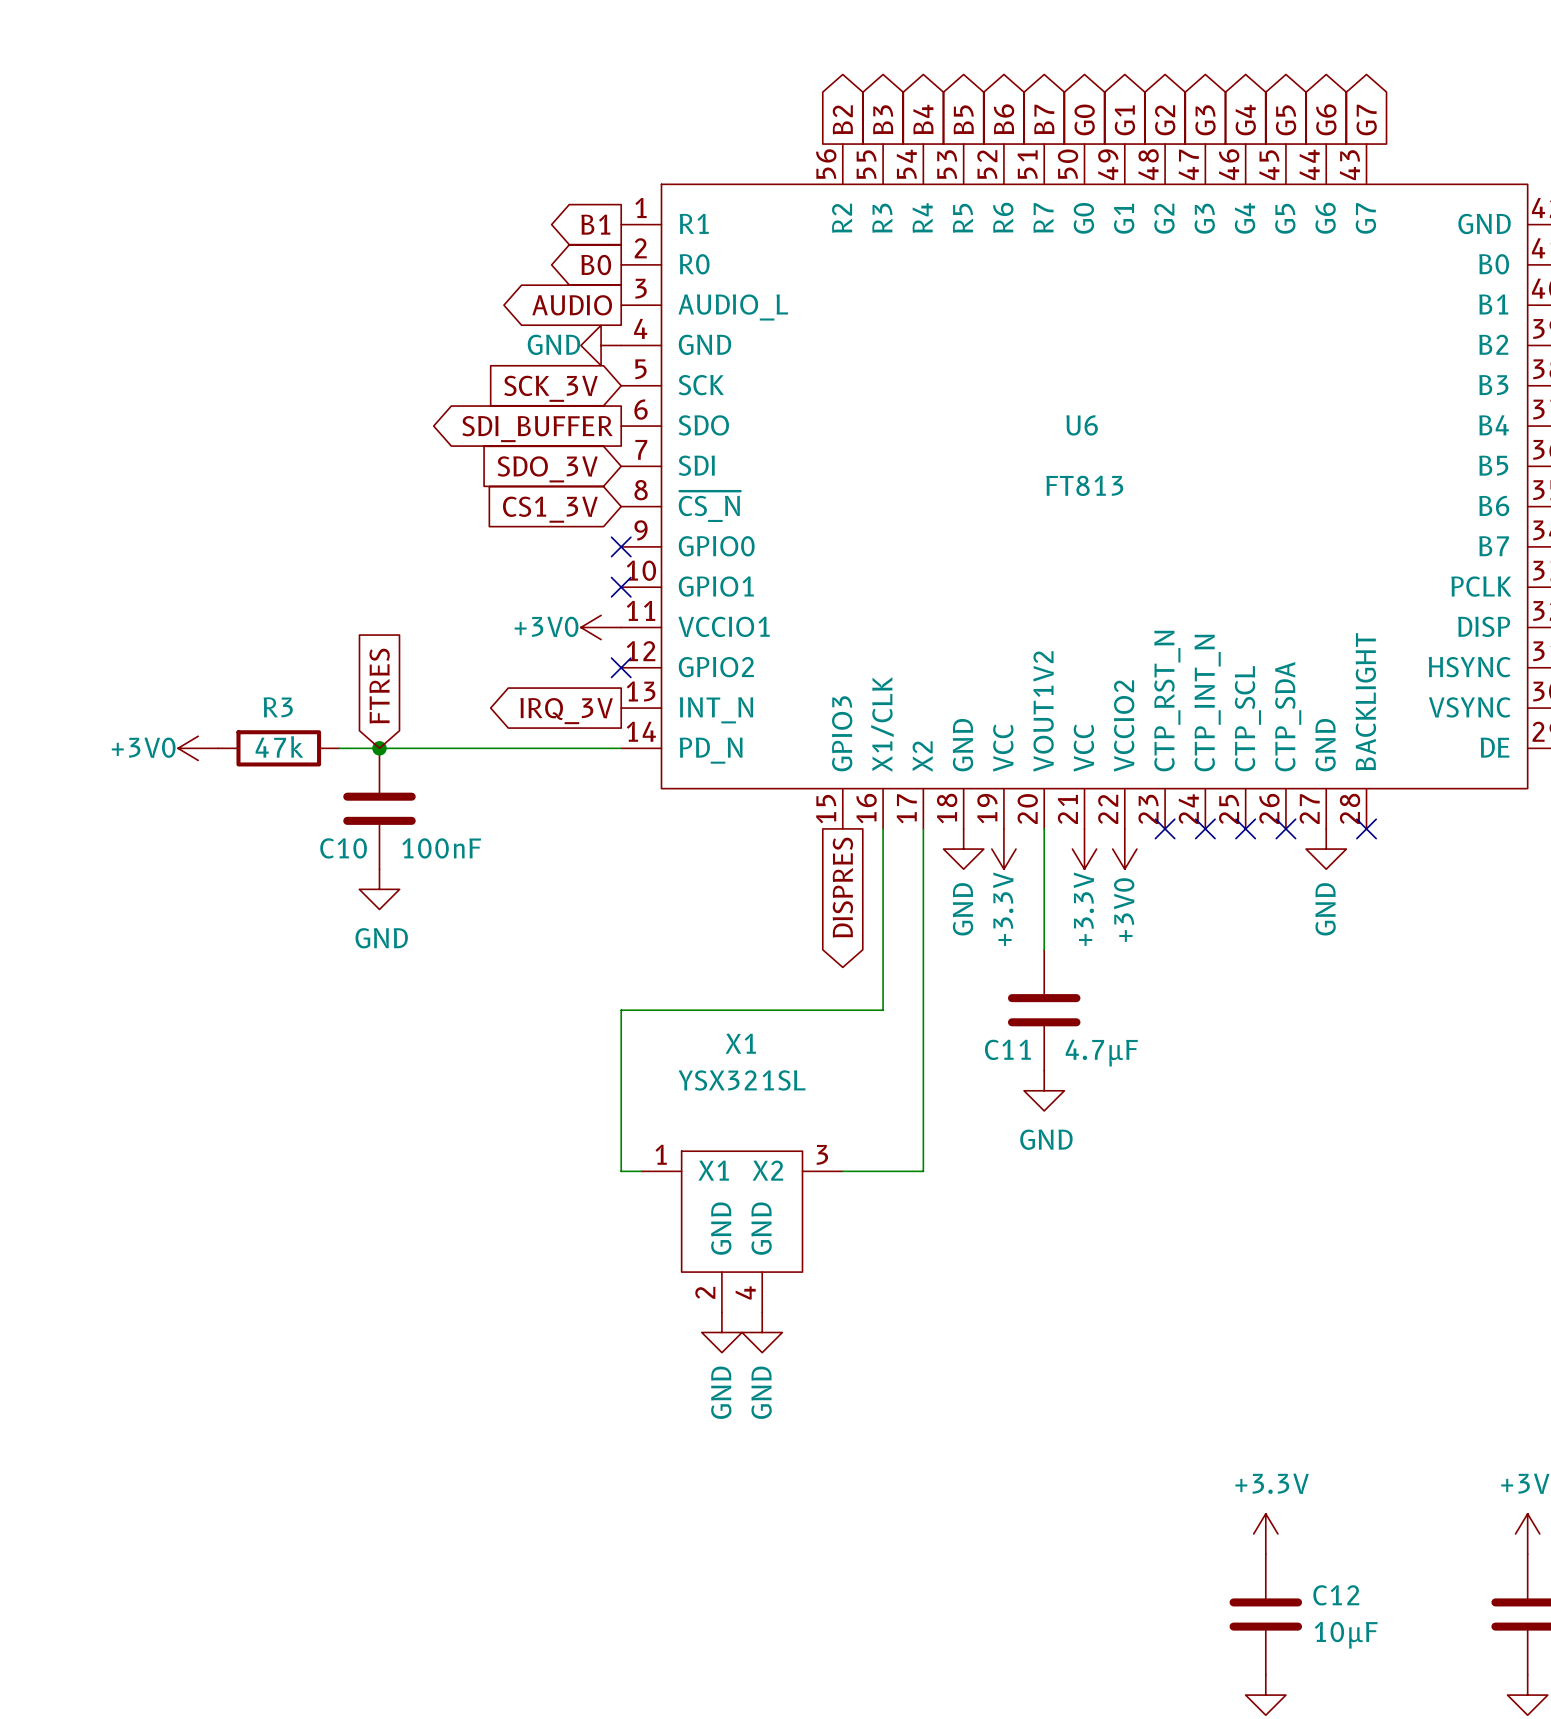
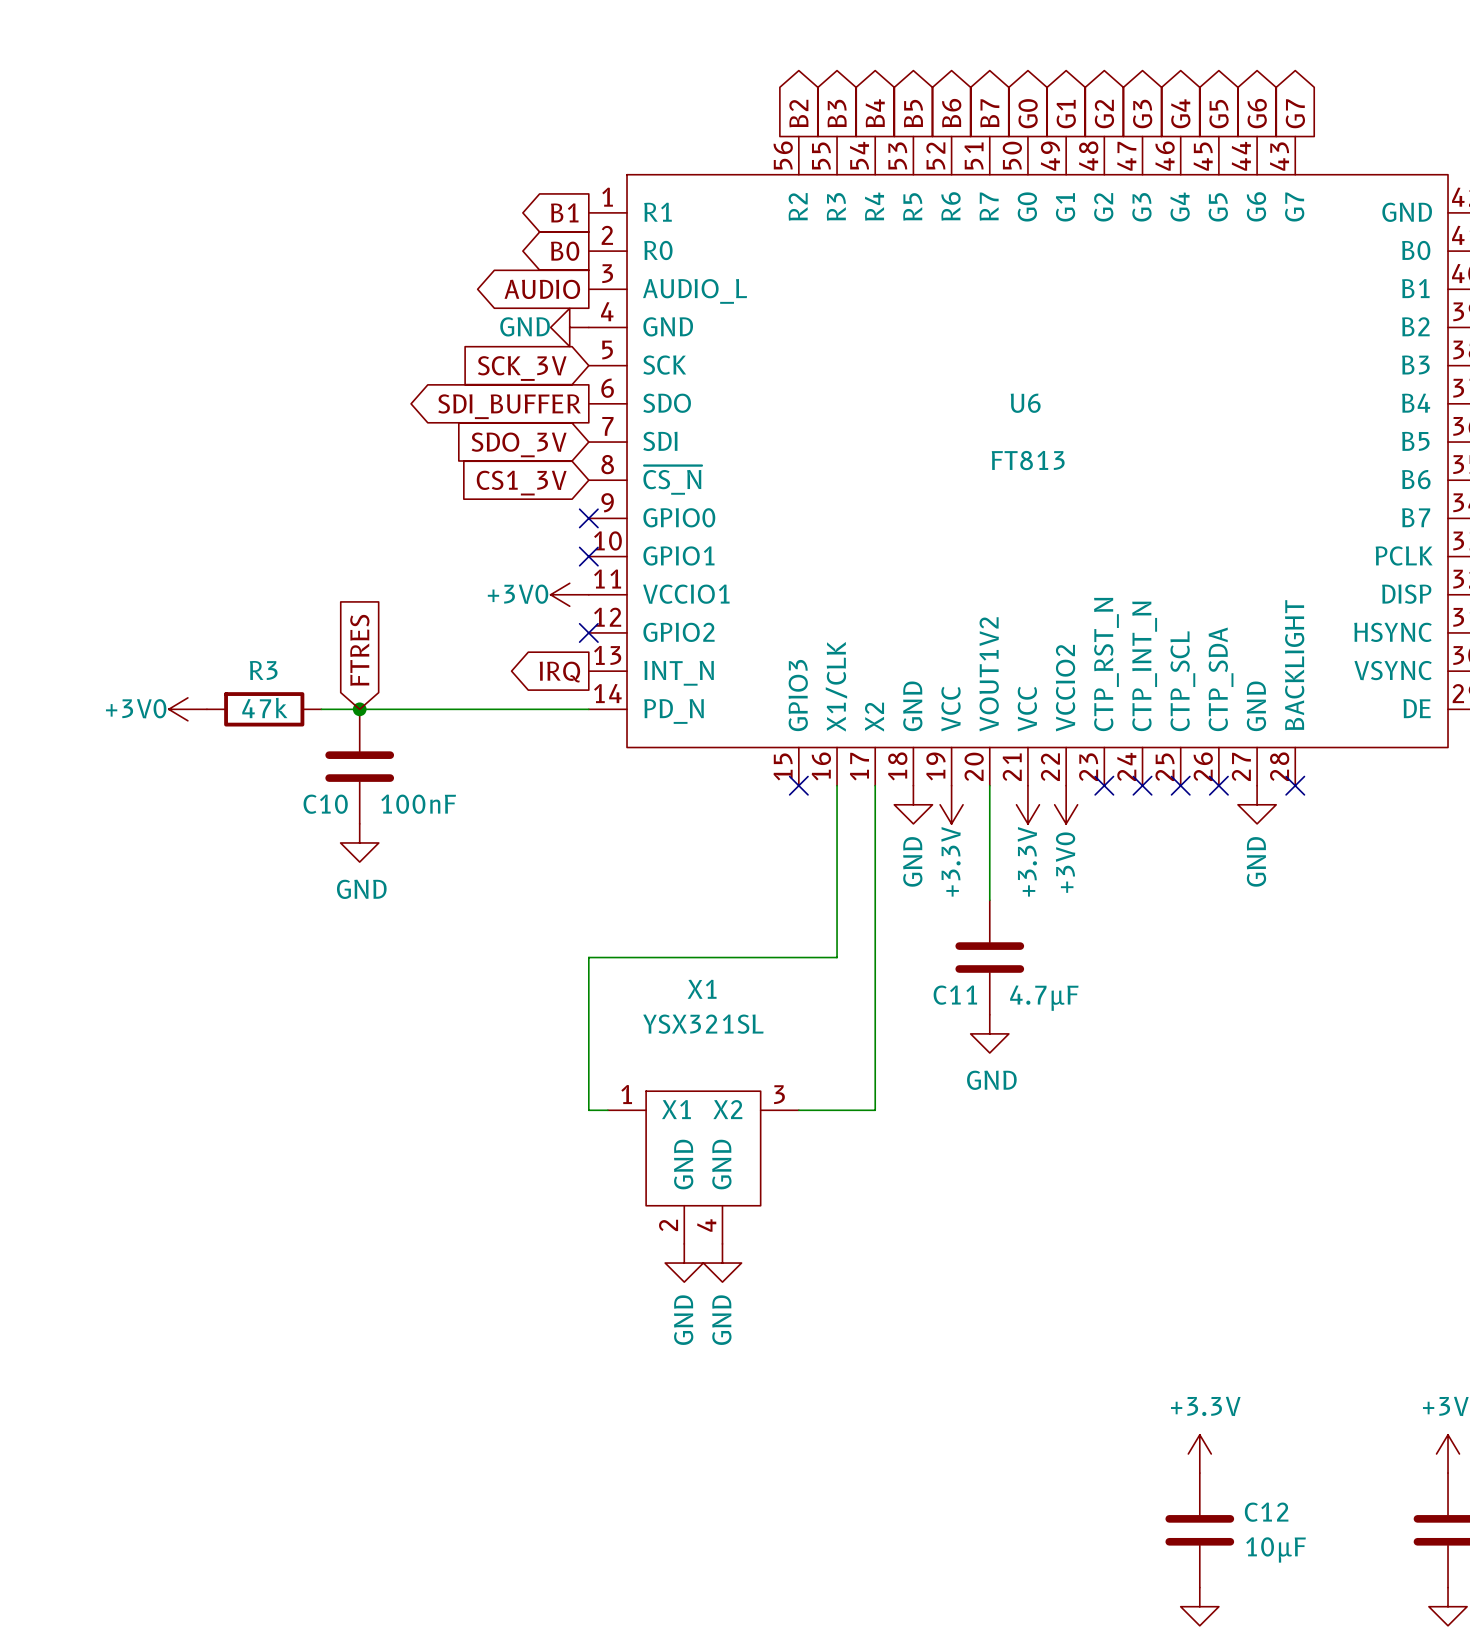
global label: IRQ_3V (566, 711) -> IRQ (559, 672)
no-connect mark: none -> (798, 785)
global label: DISPRES (842, 887) -> none

